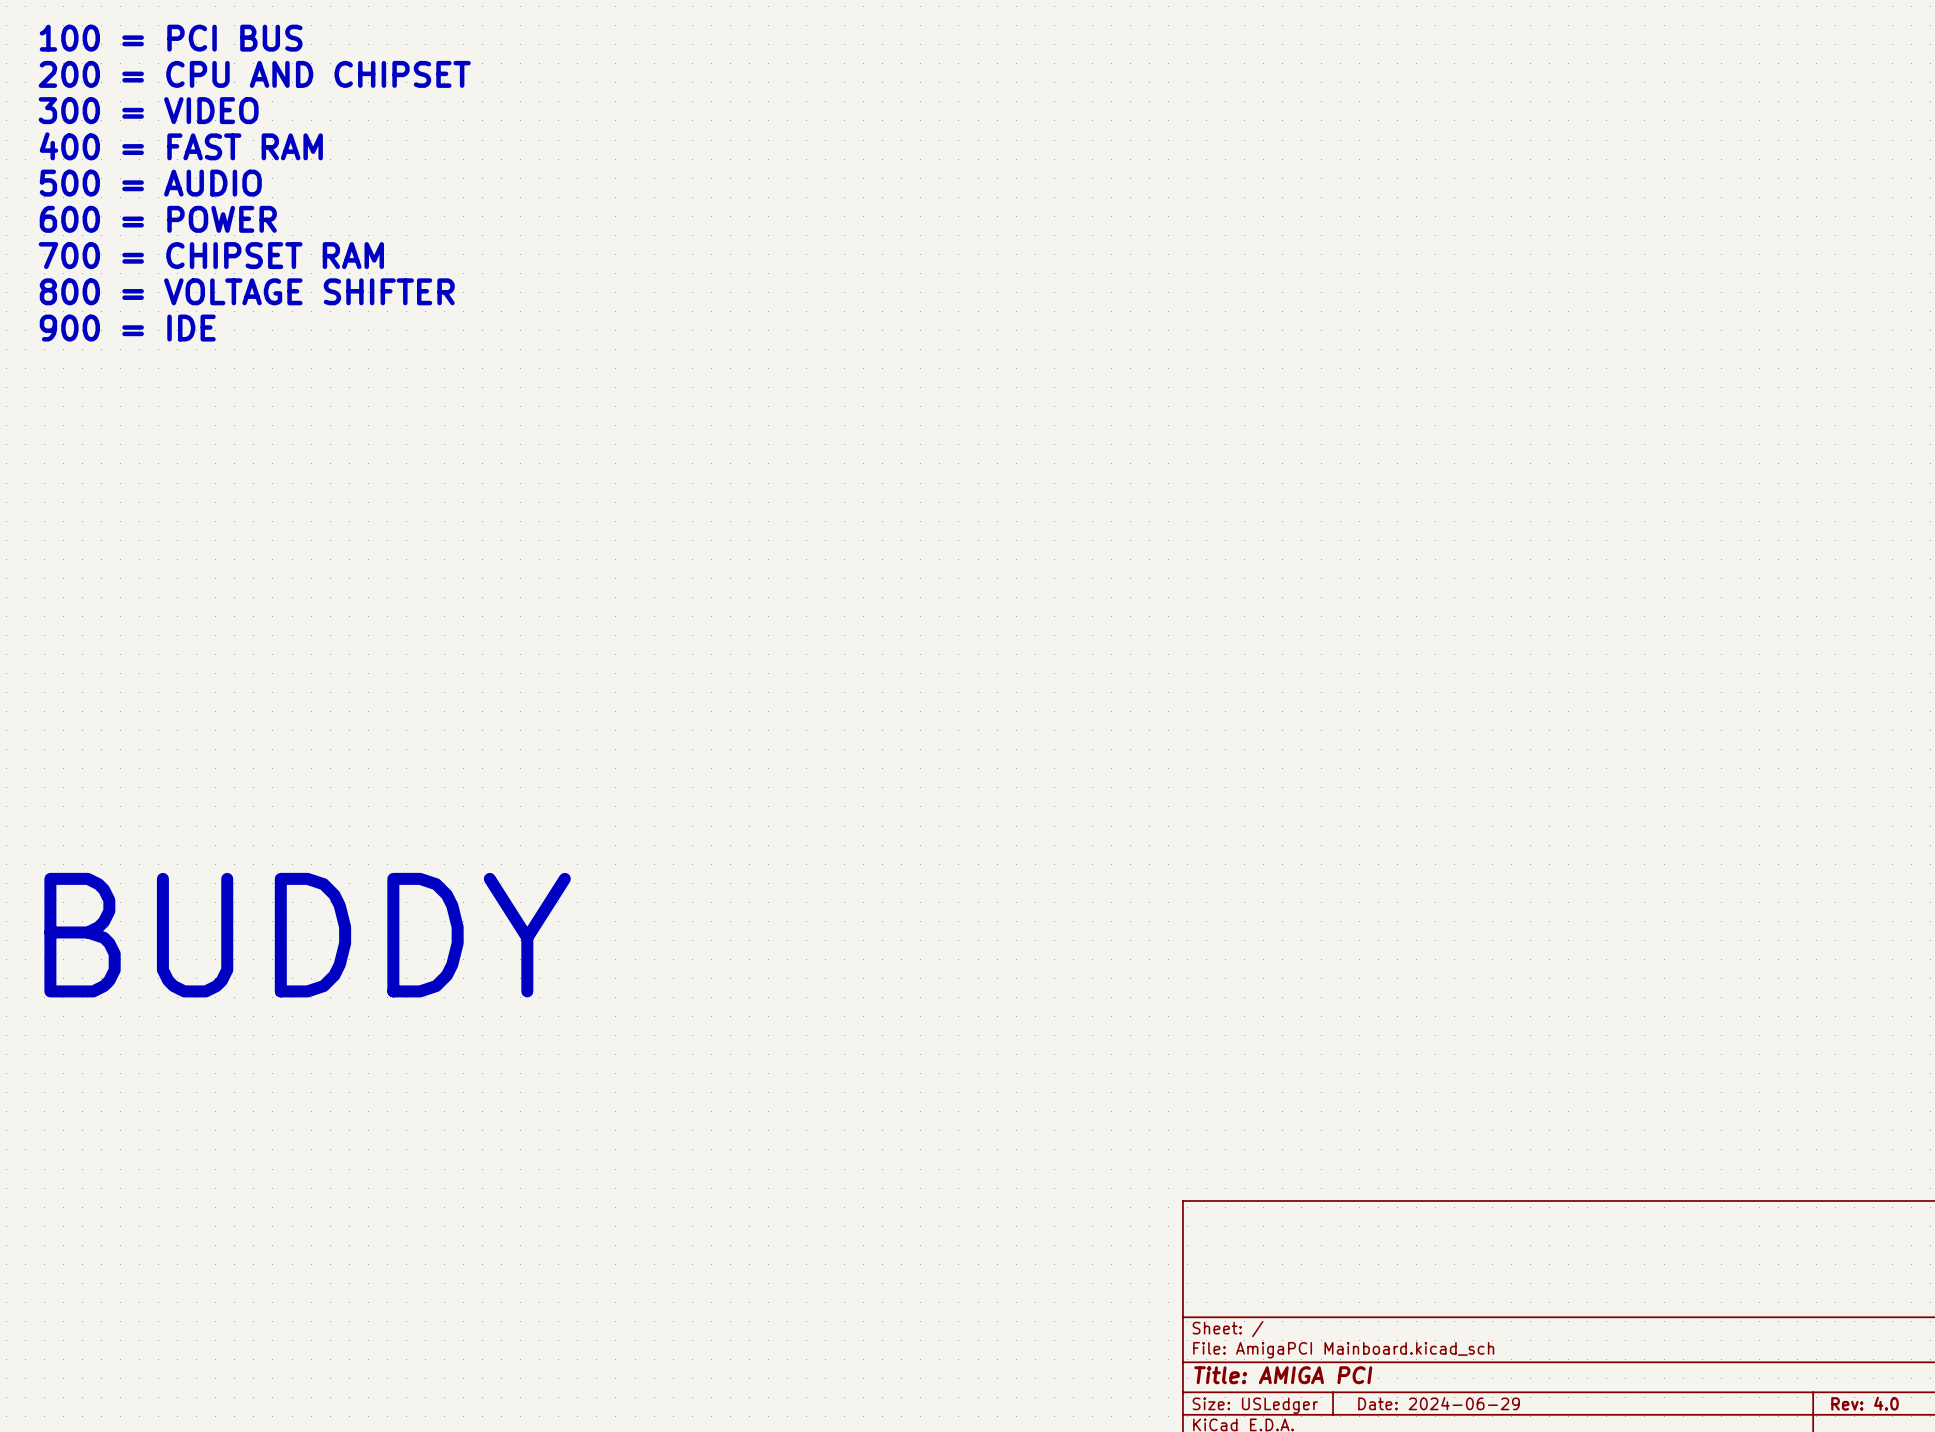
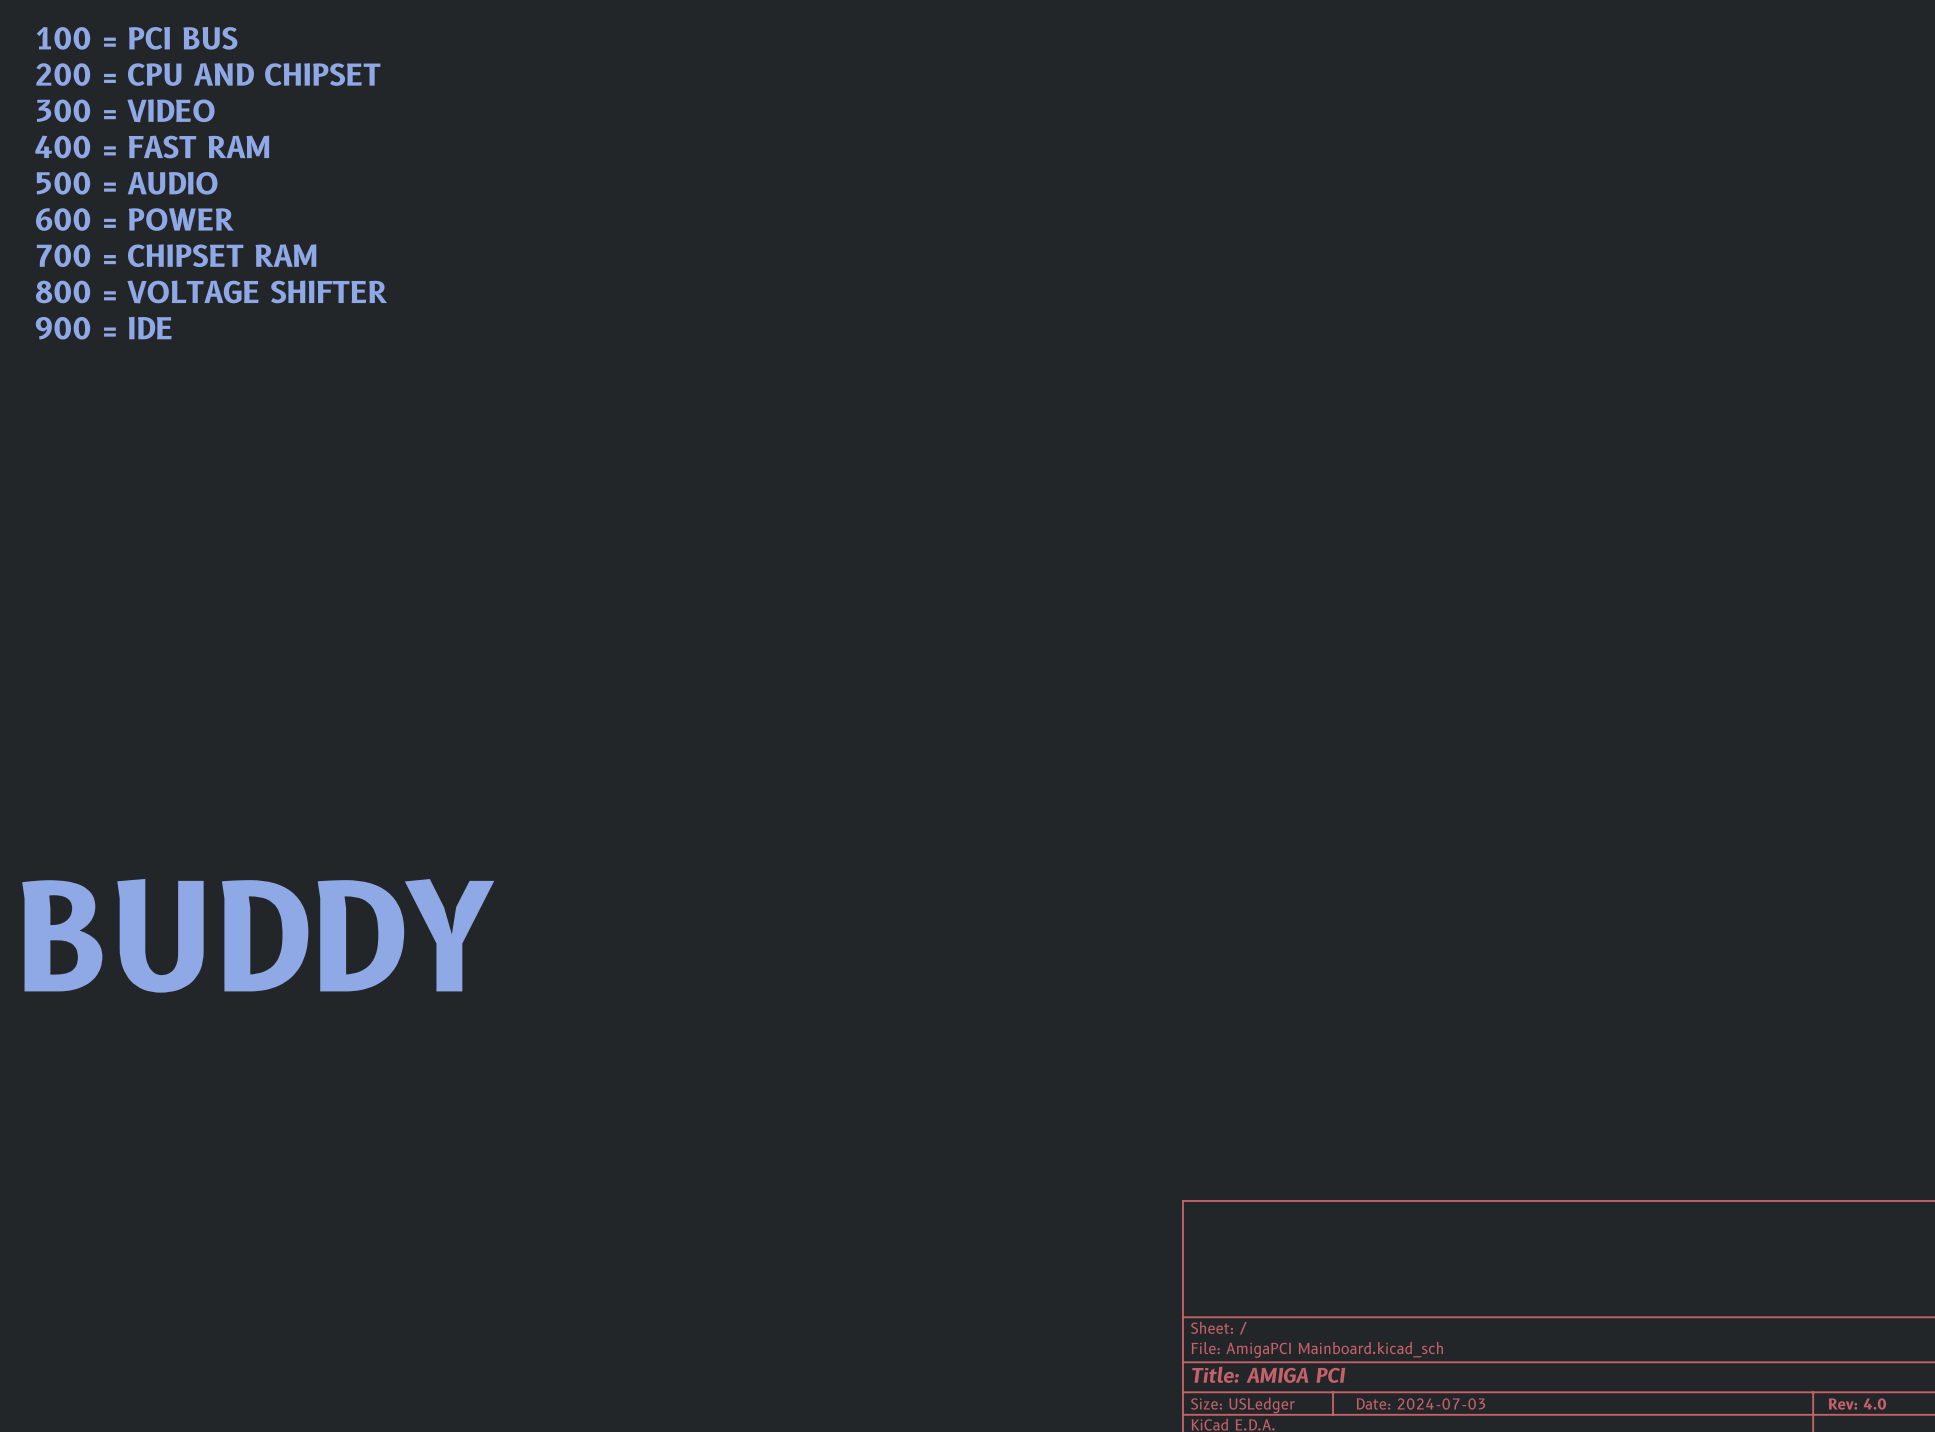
title block: Date: 2024-06-29 (1439, 1403) -> Date: 2024-07-03 (1420, 1403)

